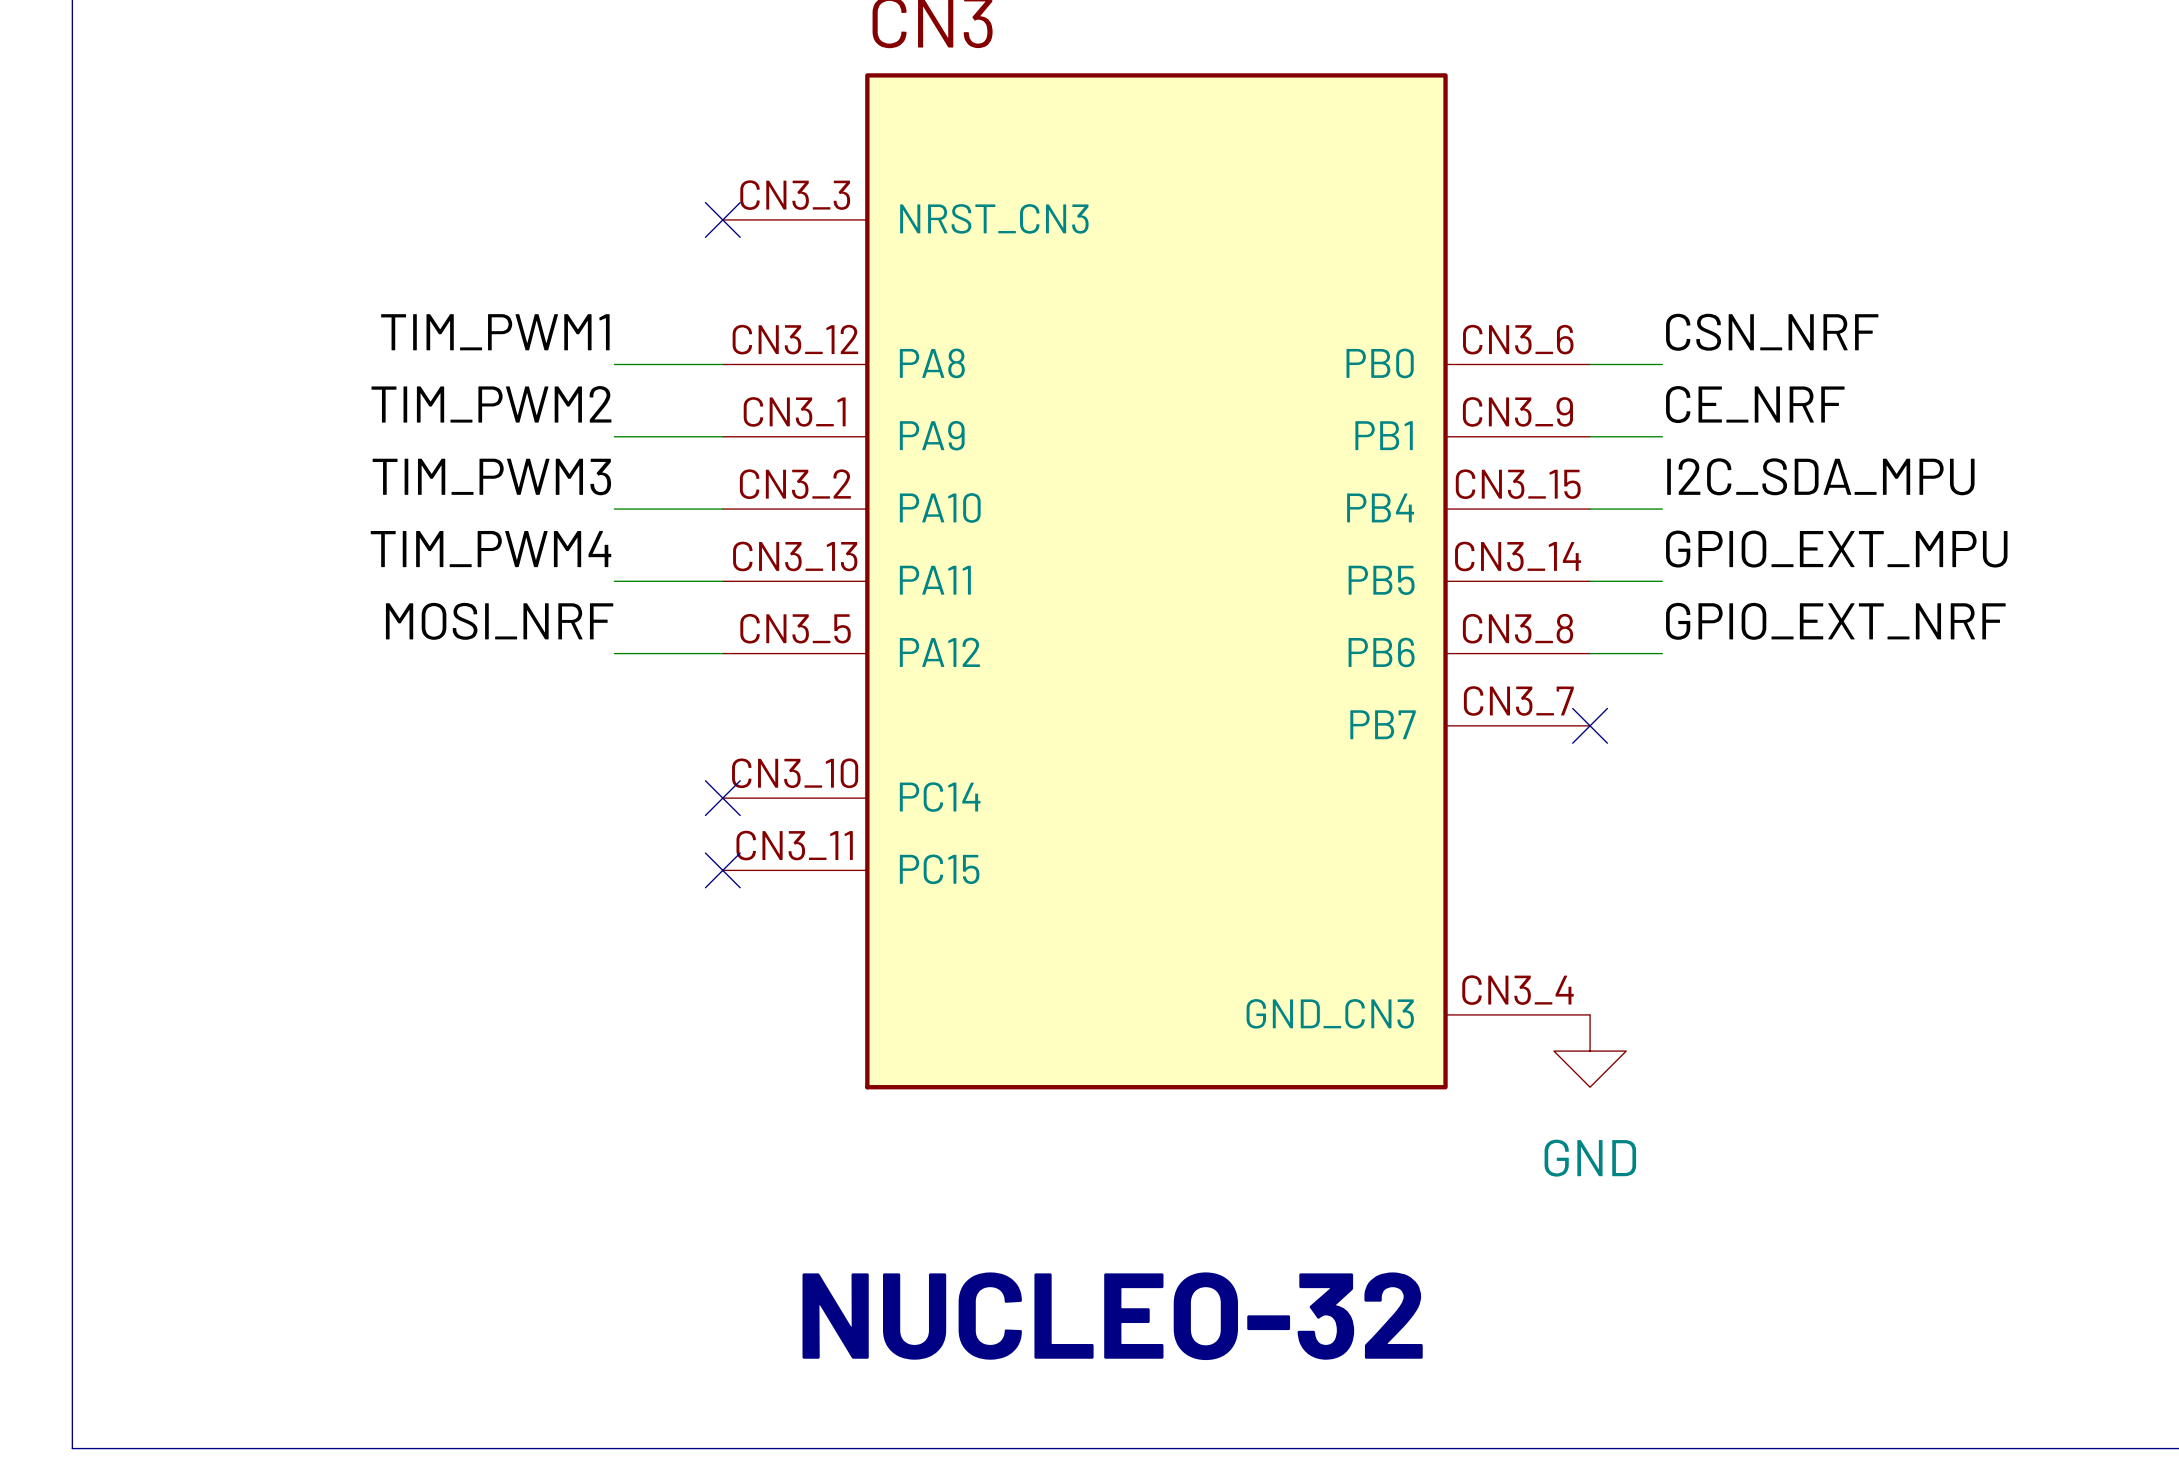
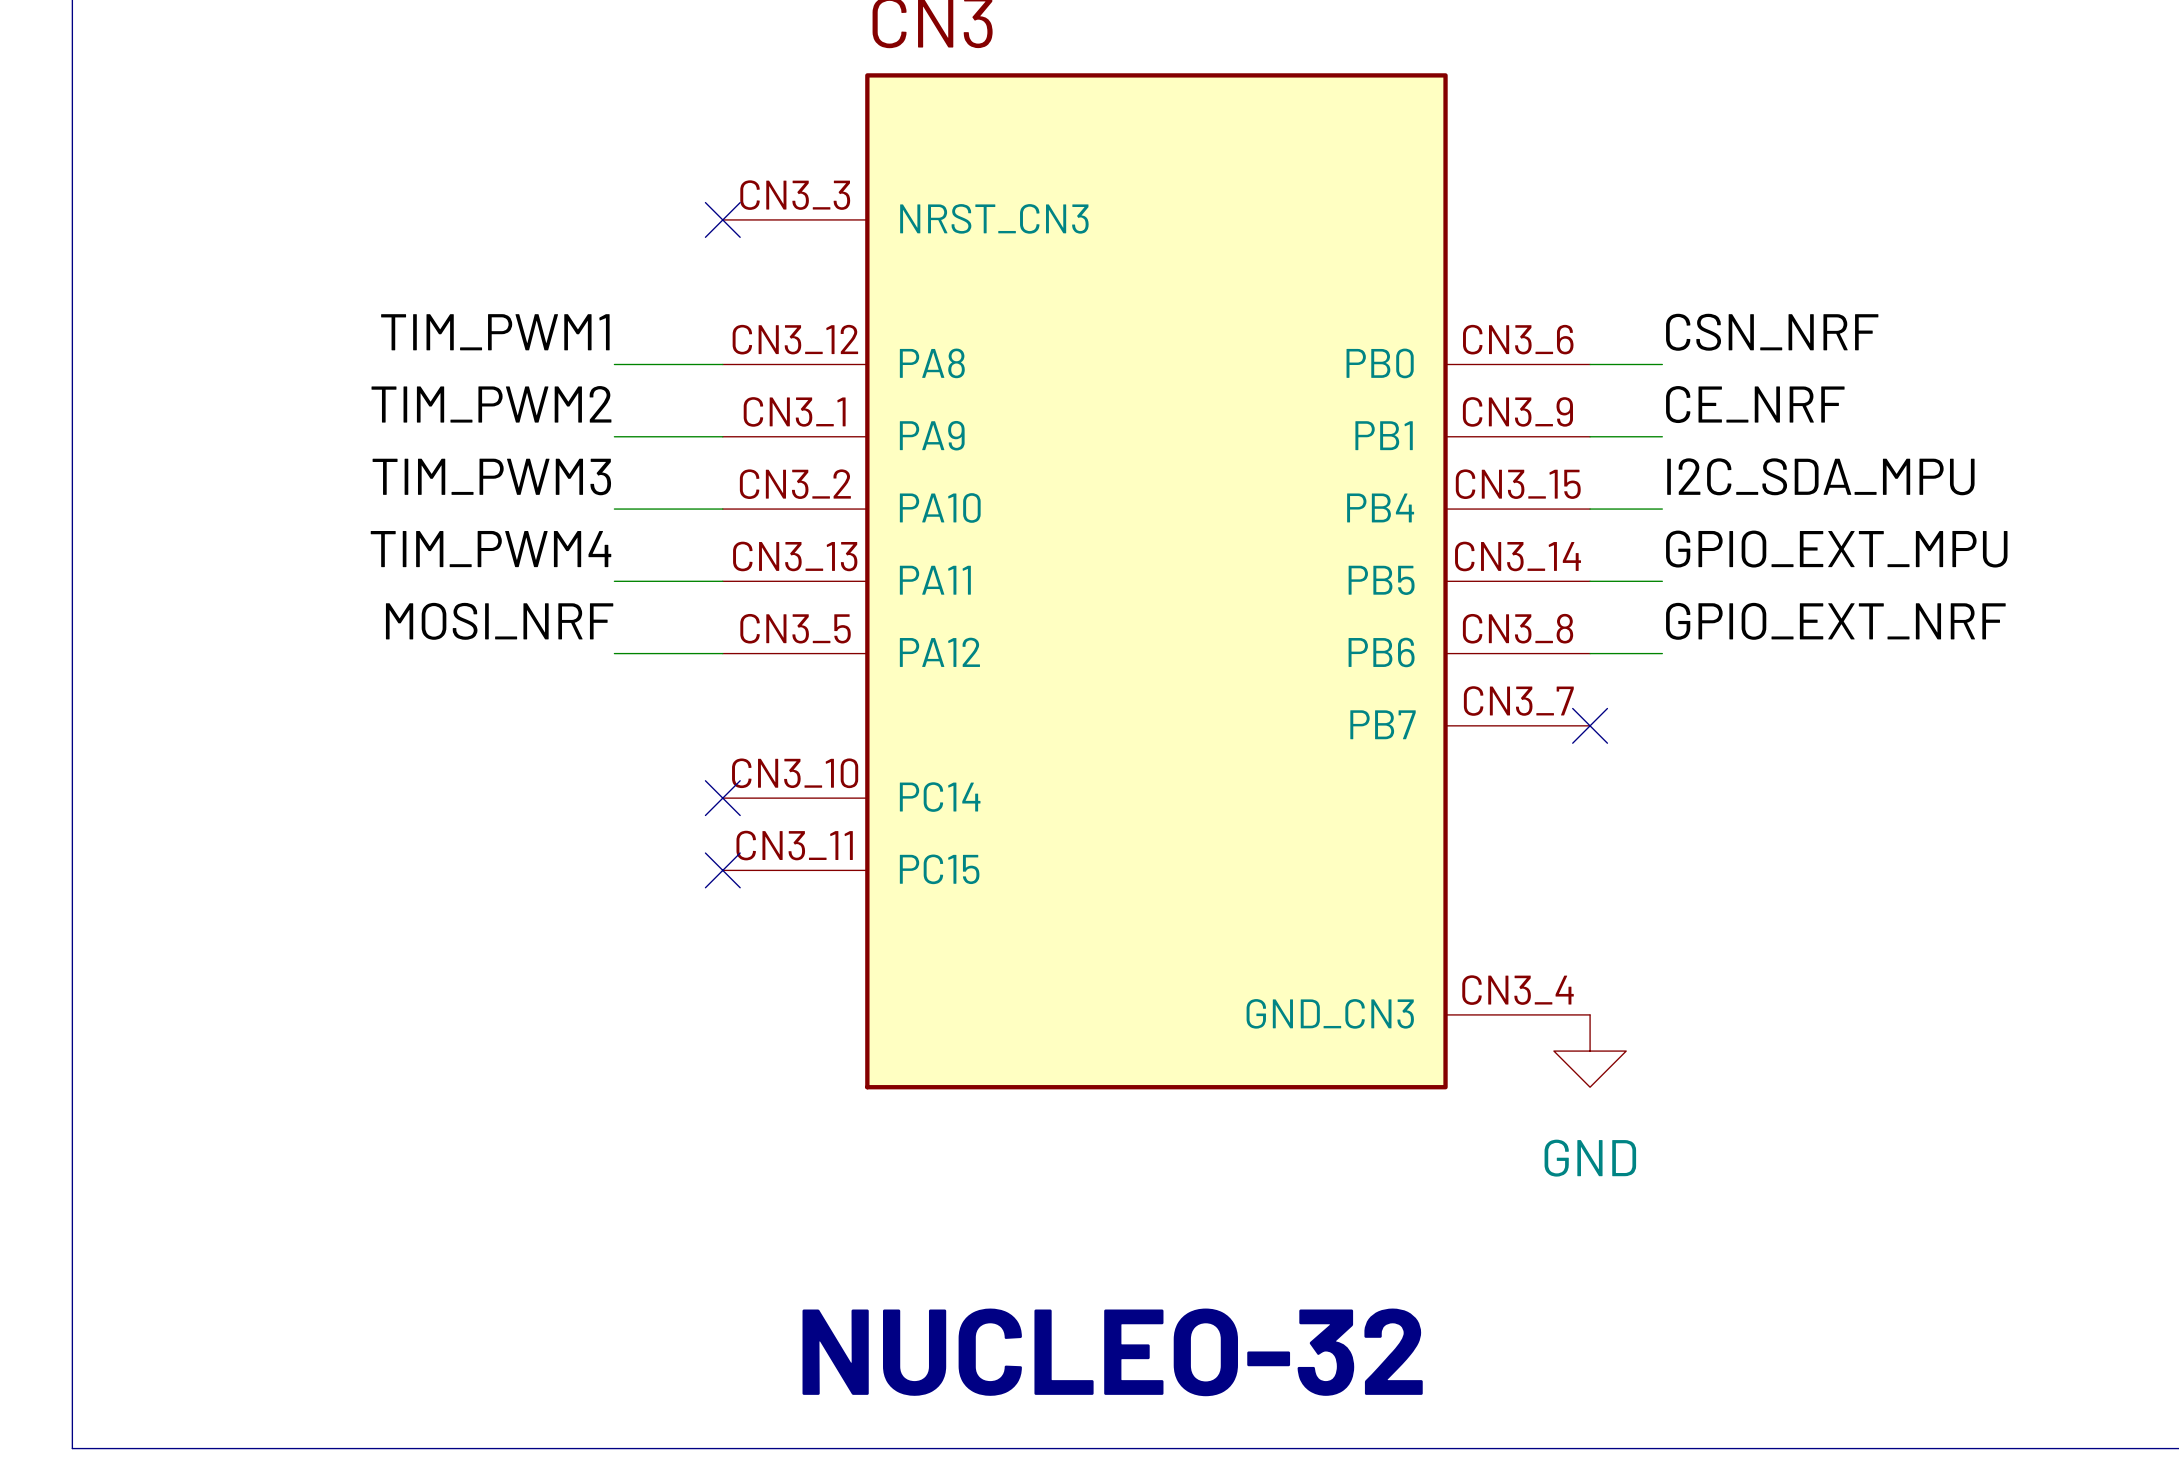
text position: NUCLEO-32 (1112, 1316) -> NUCLEO-32 (1112, 1352)

